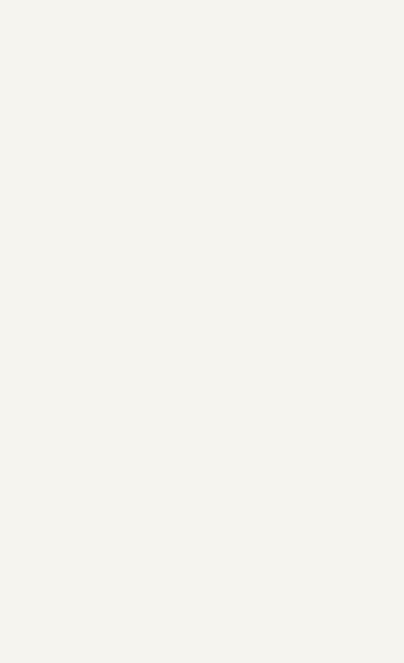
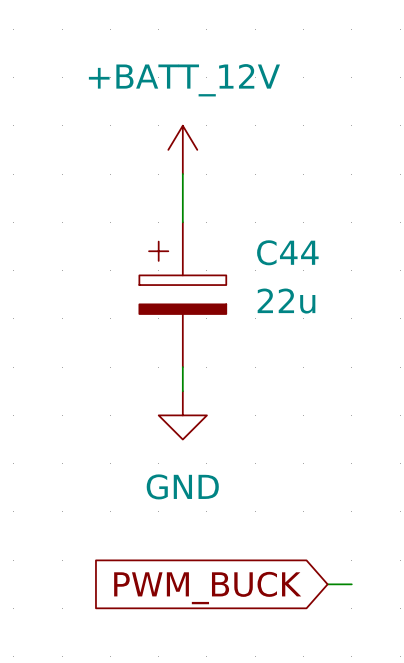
power symbol: none -> +BATT_12V (182, 149)
wire: none -> (182, 174) (182, 222)
C44: none -> 22u (182, 294)
wire: none -> (182, 367) (182, 391)
power symbol: none -> GND (182, 415)
wire: none -> (327, 584) (351, 584)
global label: none -> PWM_BUCK (207, 588)

